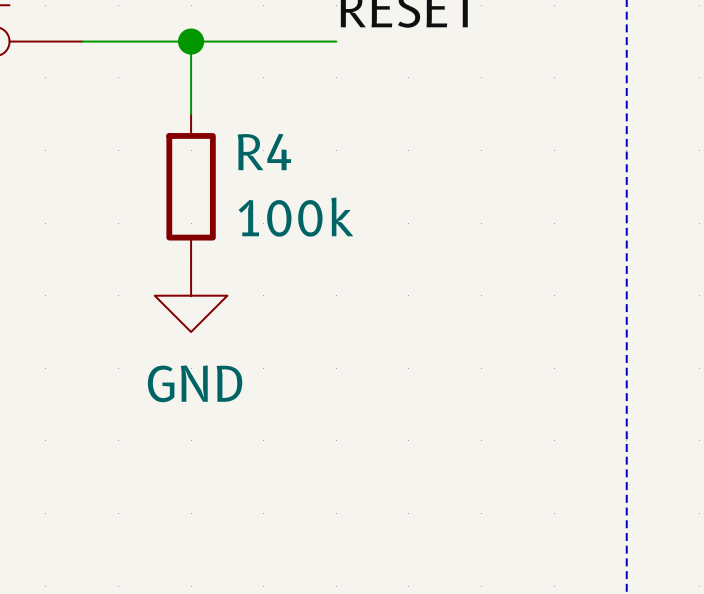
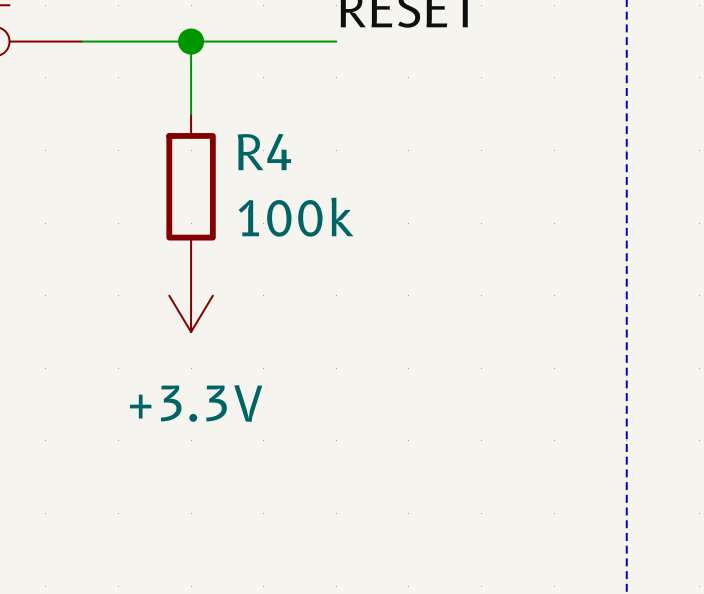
power symbol: GND (191, 295) -> +3.3V (191, 295)

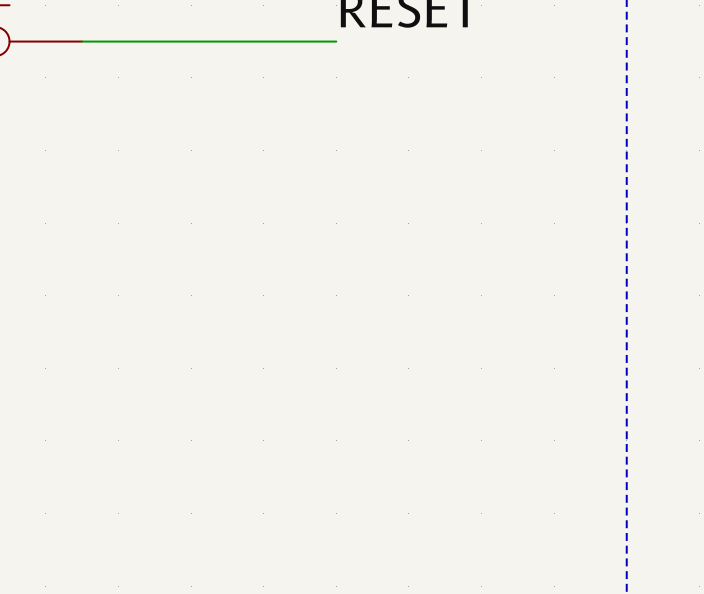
wire: (191, 41) (191, 114) -> none
junction: (191, 41) -> none
R4: 100k (191, 186) -> none
power symbol: +3.3V (191, 295) -> none

